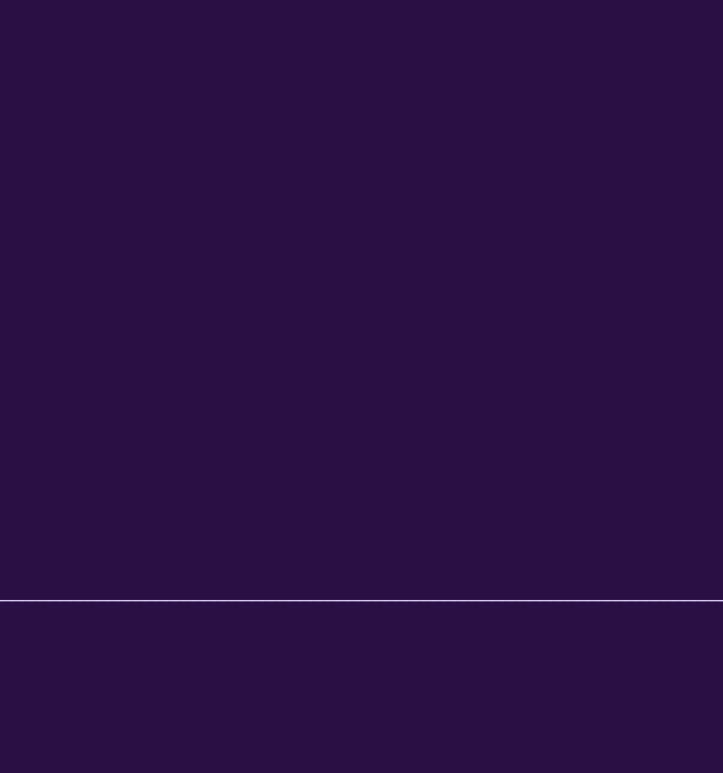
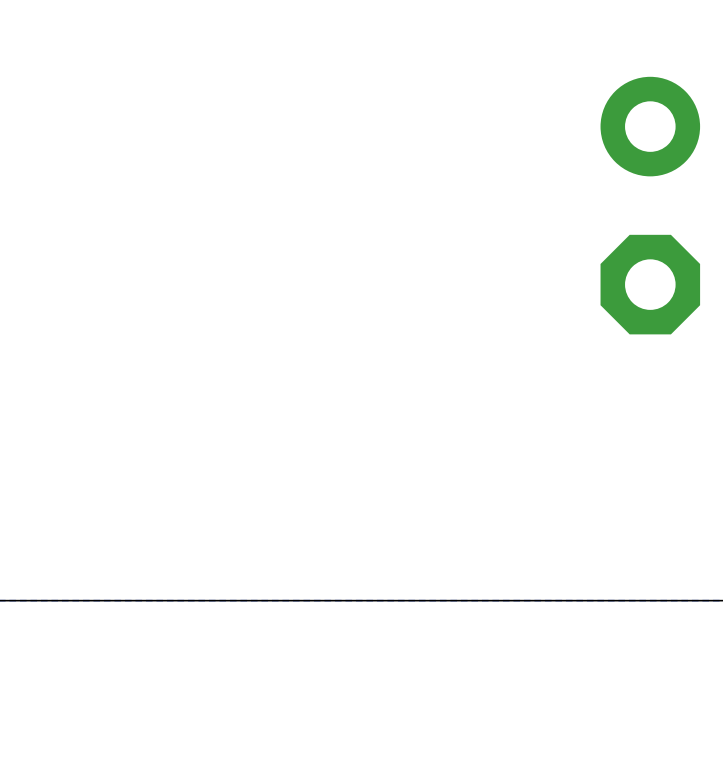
part: none -> (650, 205)

